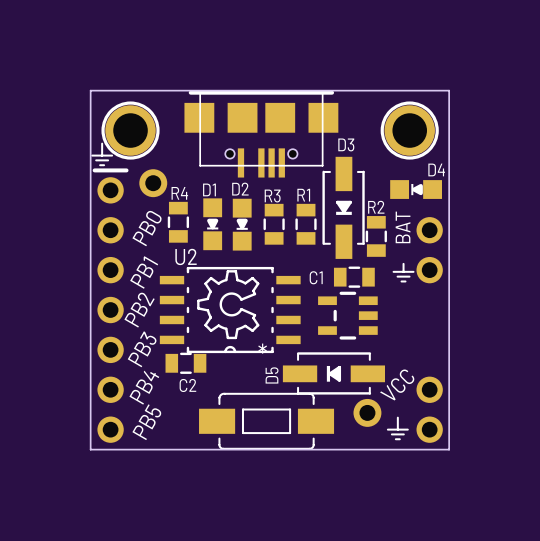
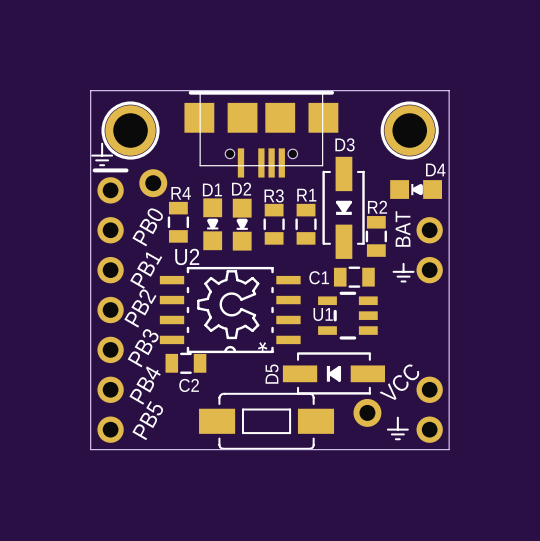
U1 name: none -> U1 (323, 314)

